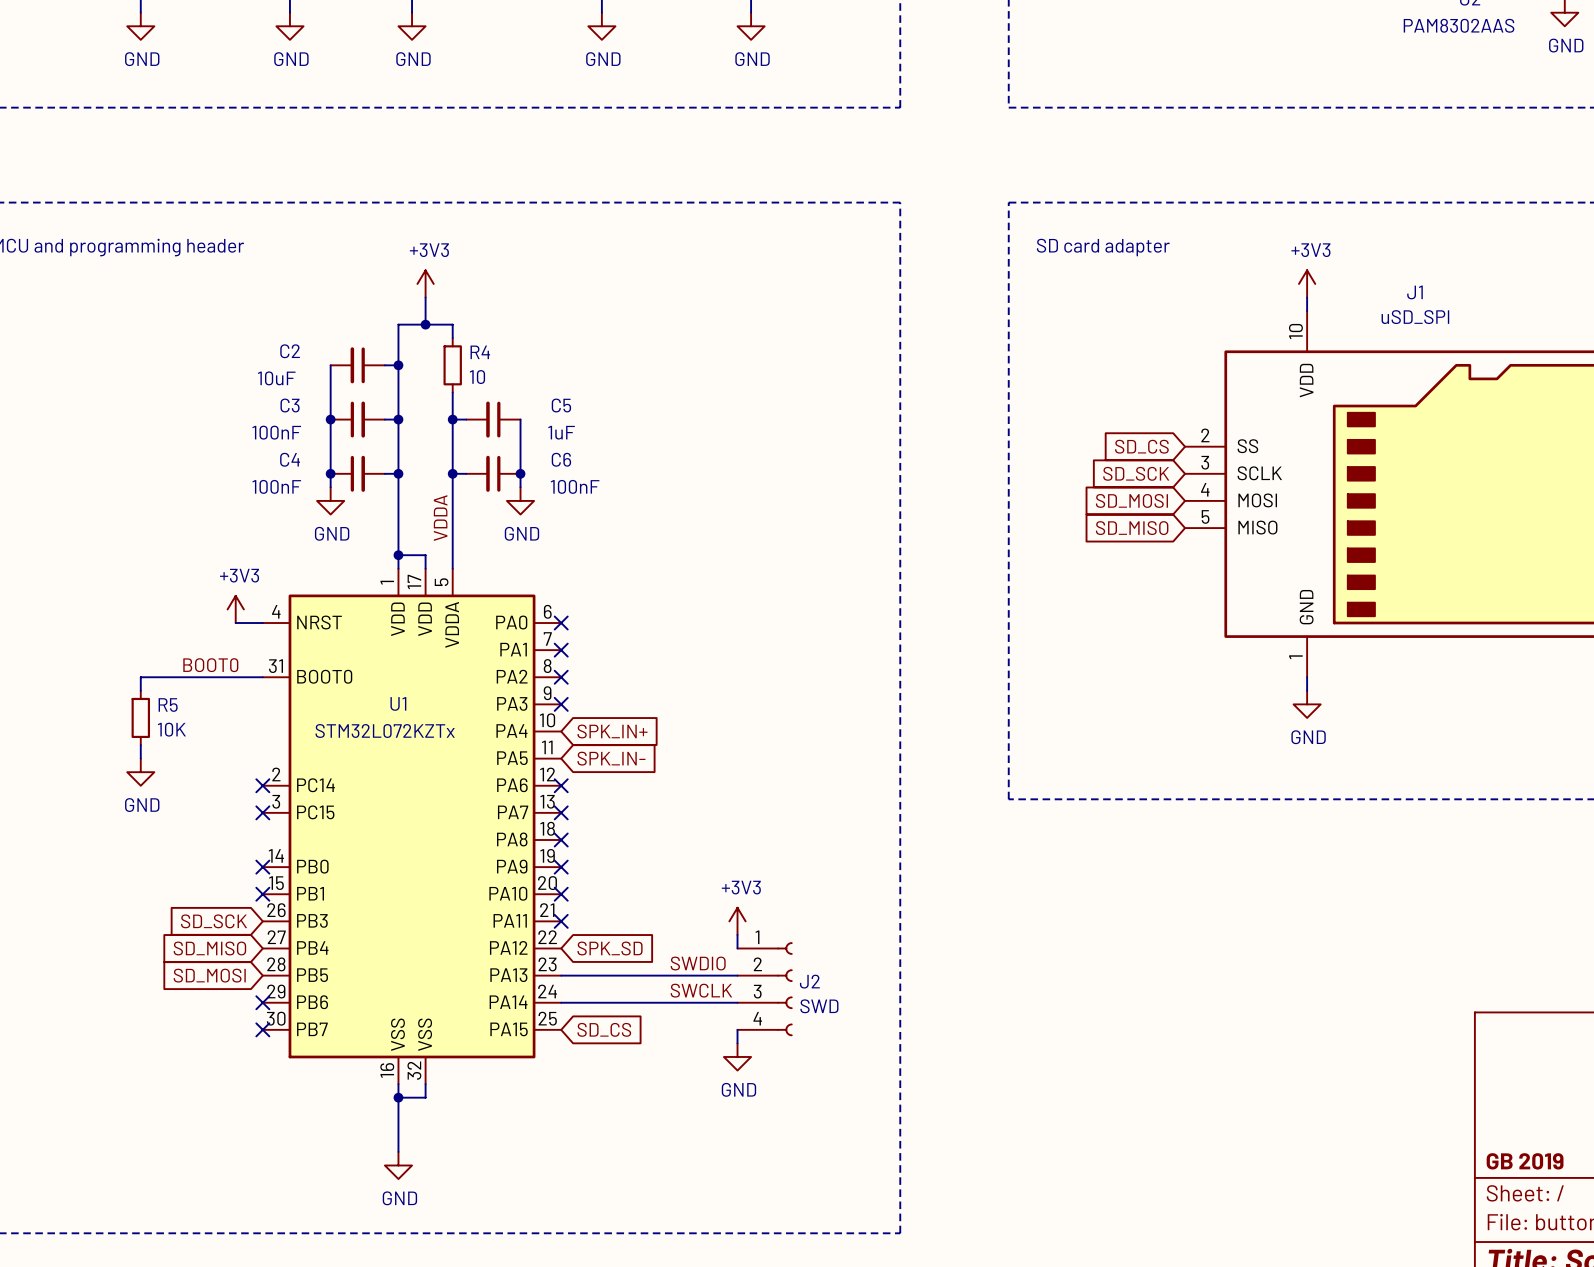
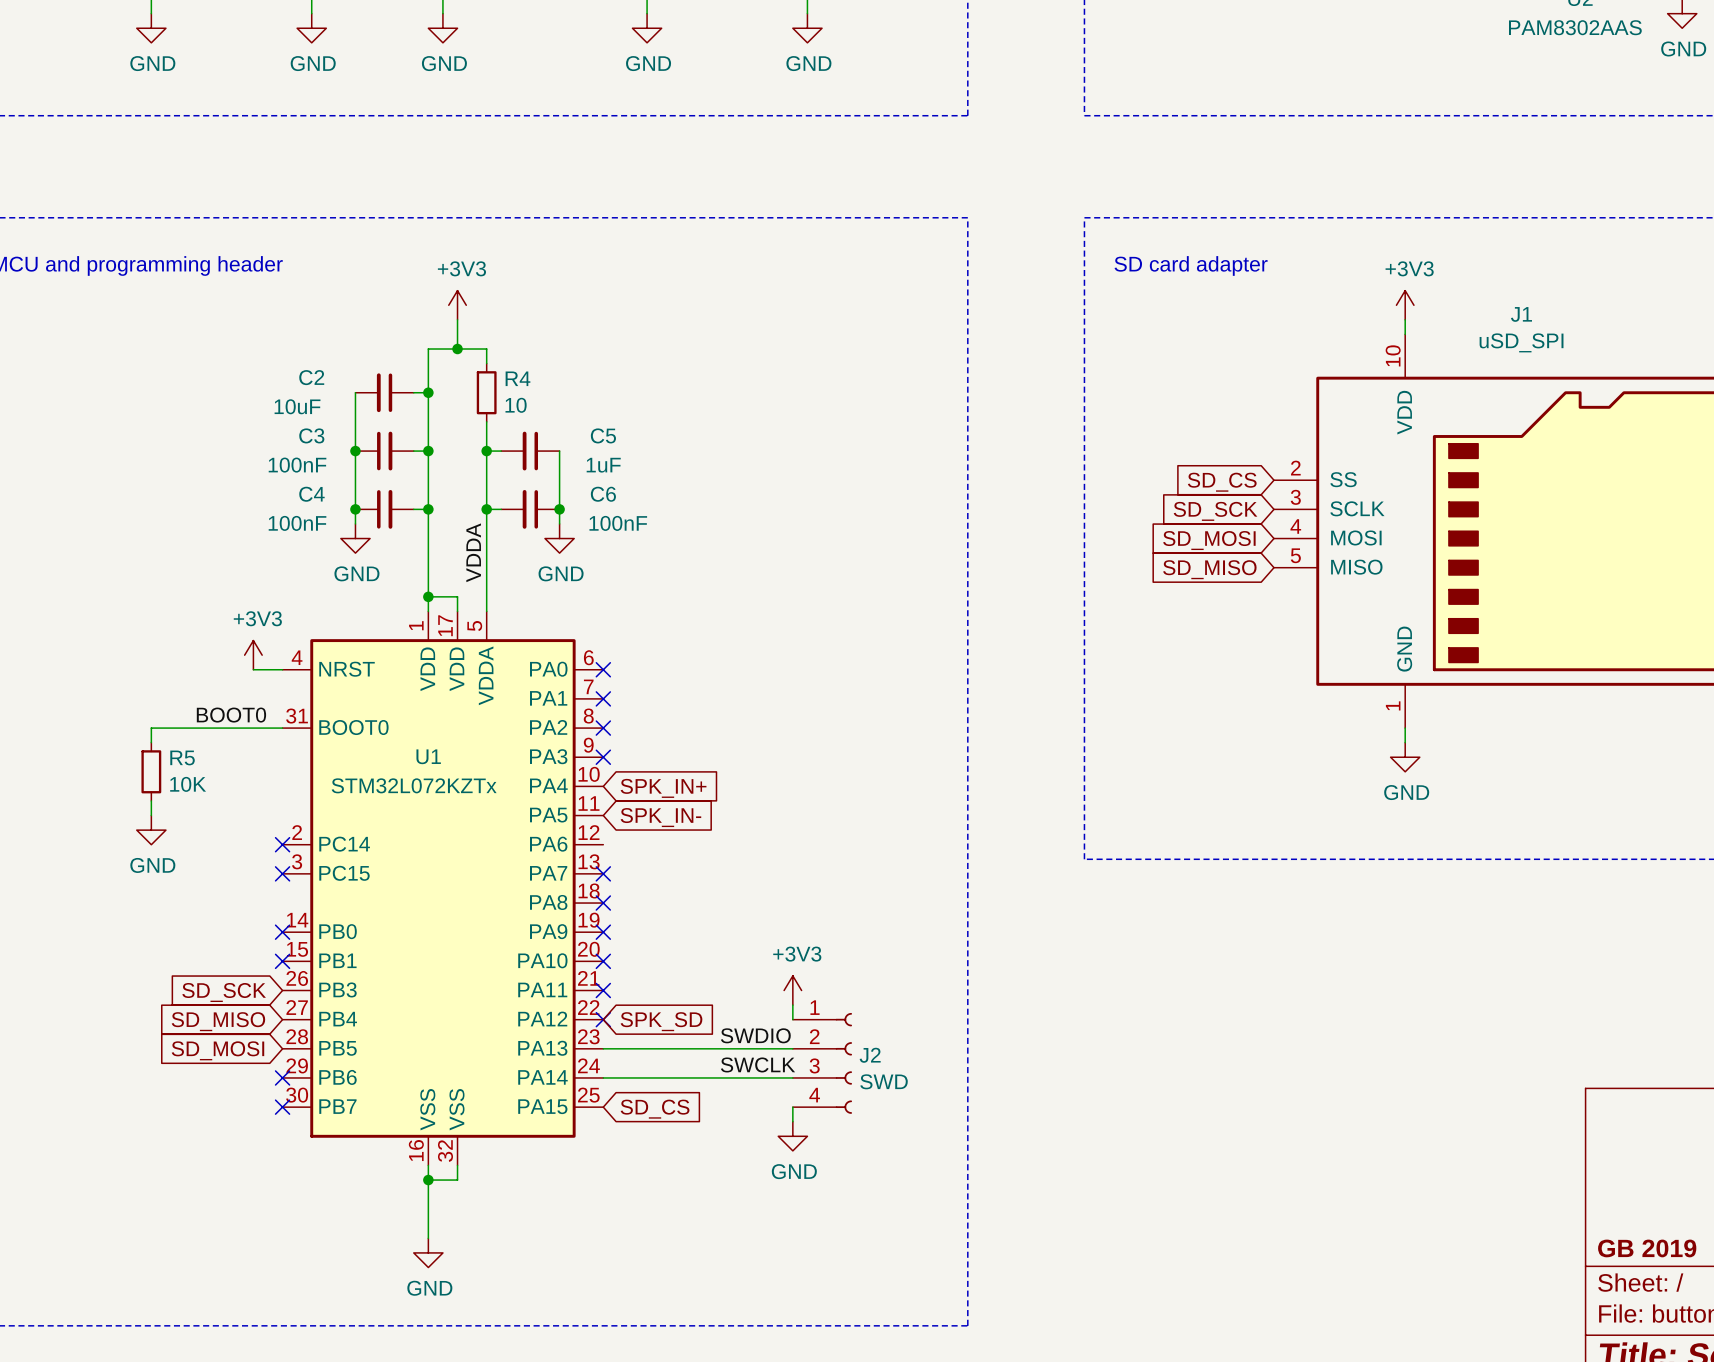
no-connect mark: (561, 785) -> none
no-connect mark: none -> (603, 1019)

